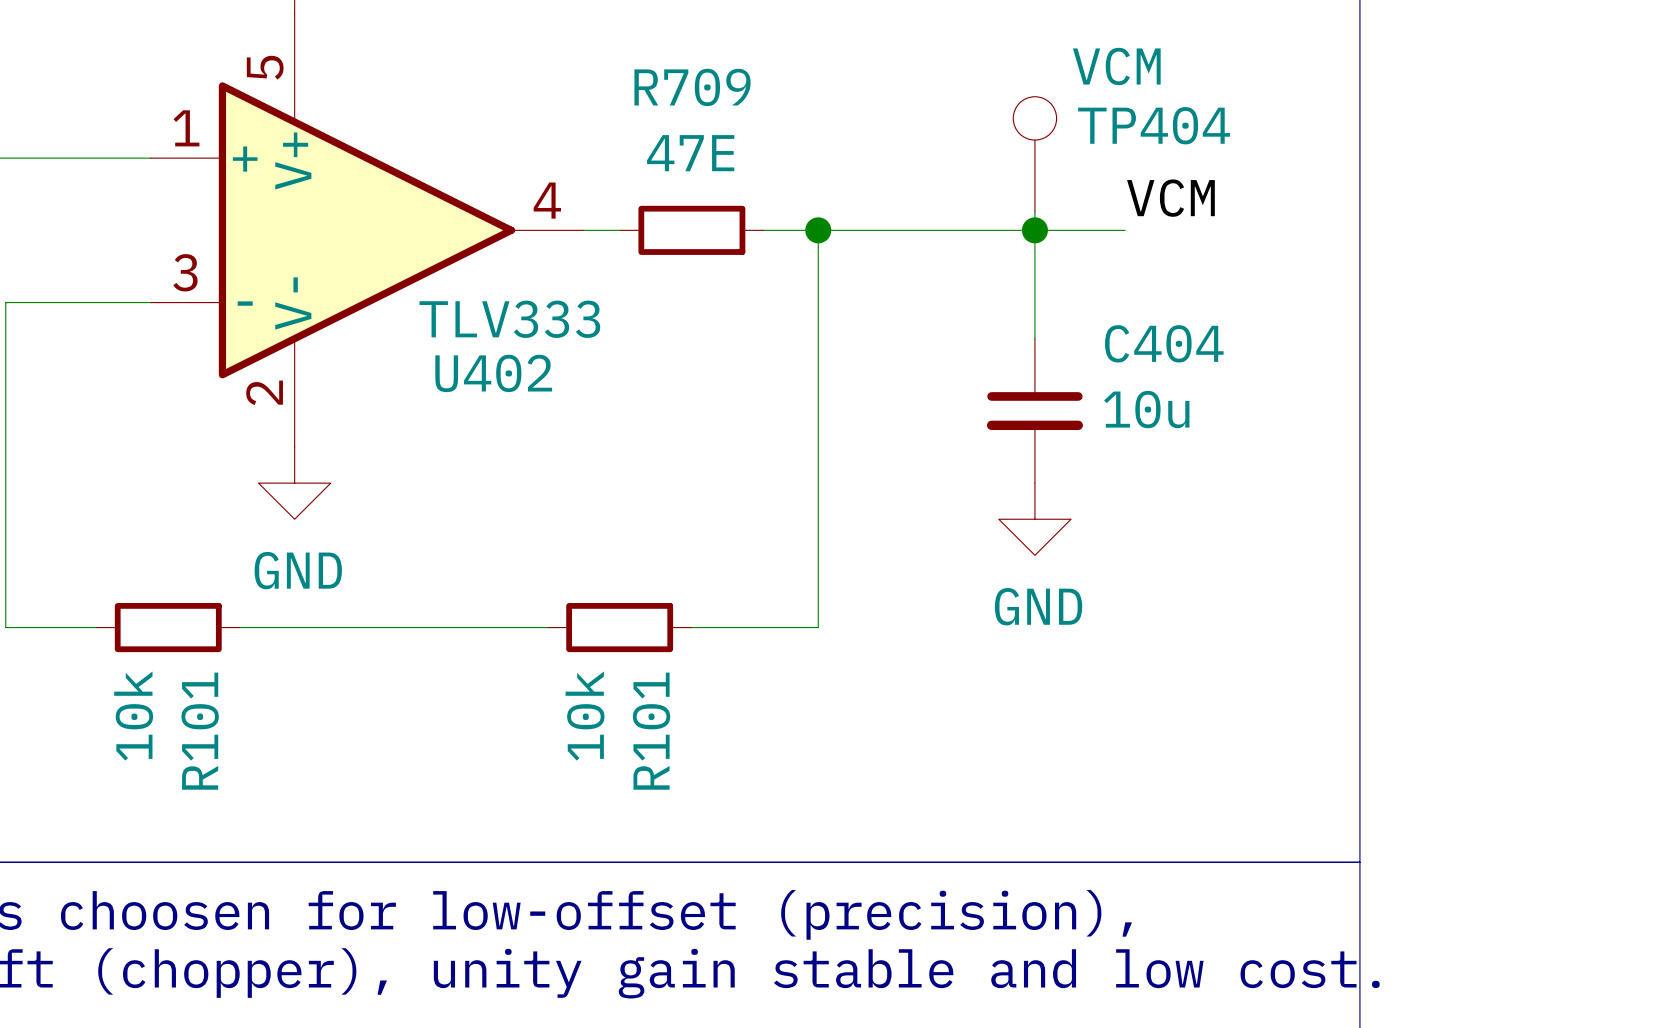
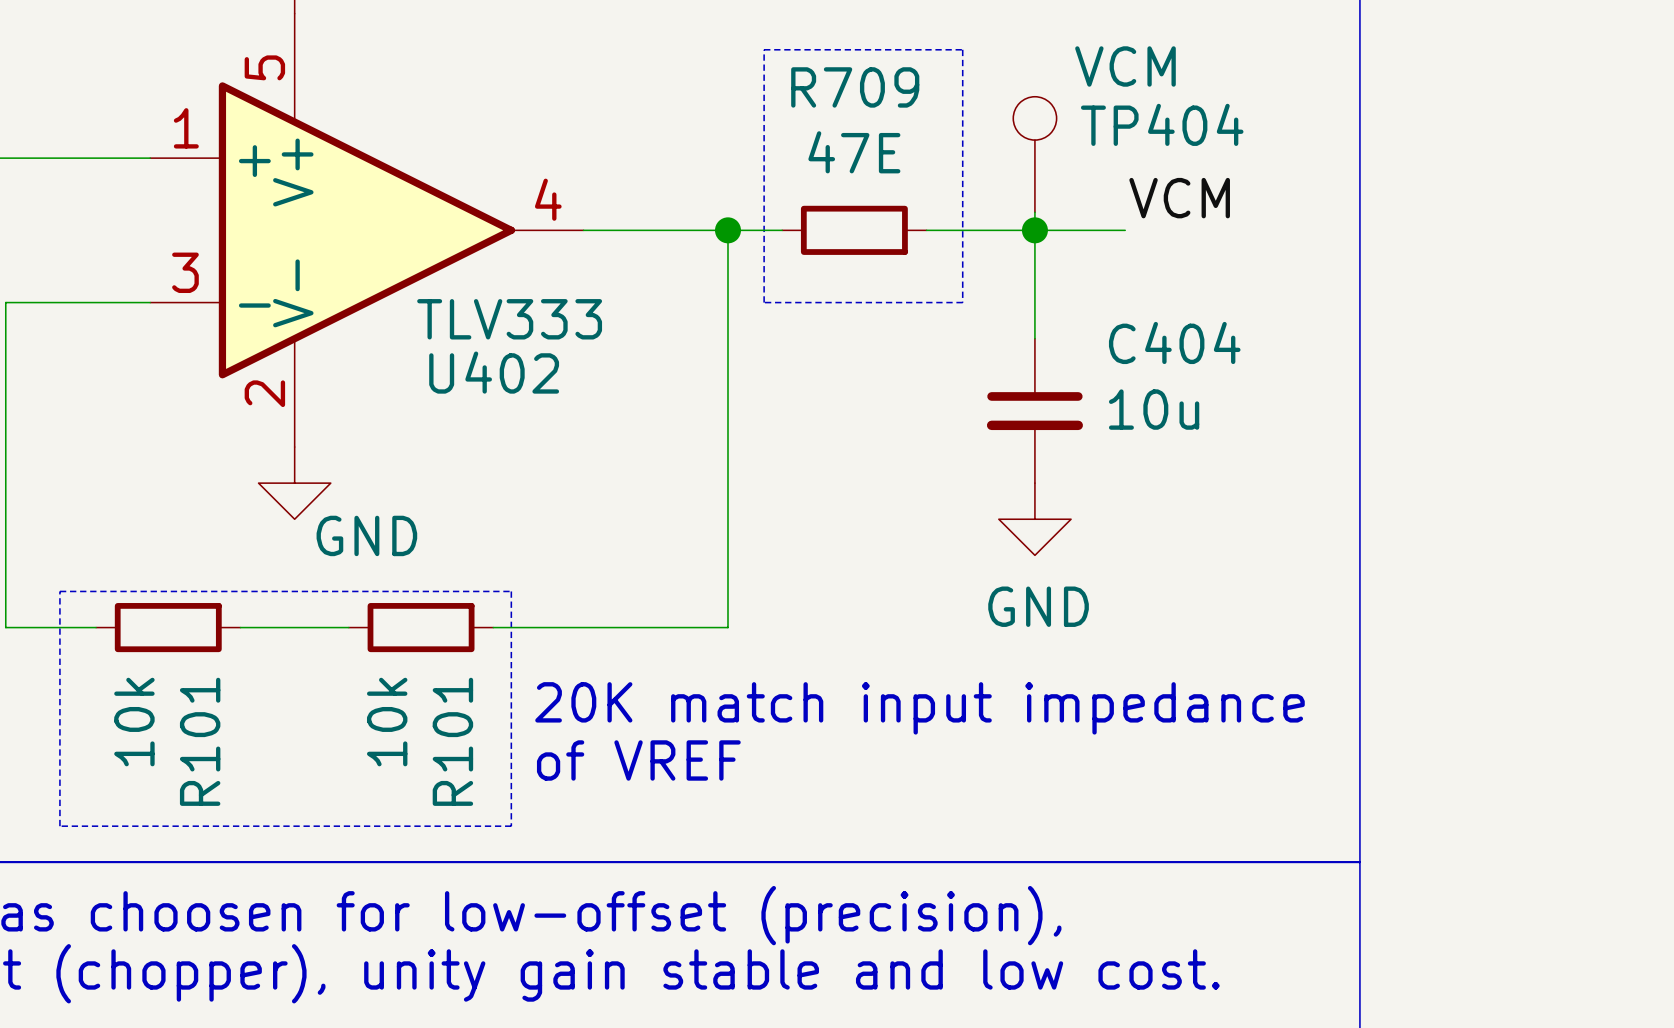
line: none -> (764, 49) (962, 49) (962, 302) (764, 302) (764, 49)
R709 position: (691, 230) -> (854, 230)
wire: (782, 230) (926, 230) -> (619, 230) (764, 230)
wire: (818, 230) (818, 627) (727, 627) -> (727, 230) (727, 627)
junction position: (818, 230) -> (727, 230)
power symbol text position: GND (298, 570) -> GND (366, 535)
line: none -> (59, 591) (511, 591) (511, 826) (59, 826) (59, 591)
wire: (348, 627) (493, 627) -> (547, 627) (691, 627)
R101 position: (619, 627) -> (421, 627)
text: none -> 20K match input impedance (920, 708)
text: none -> of VREF (638, 760)

